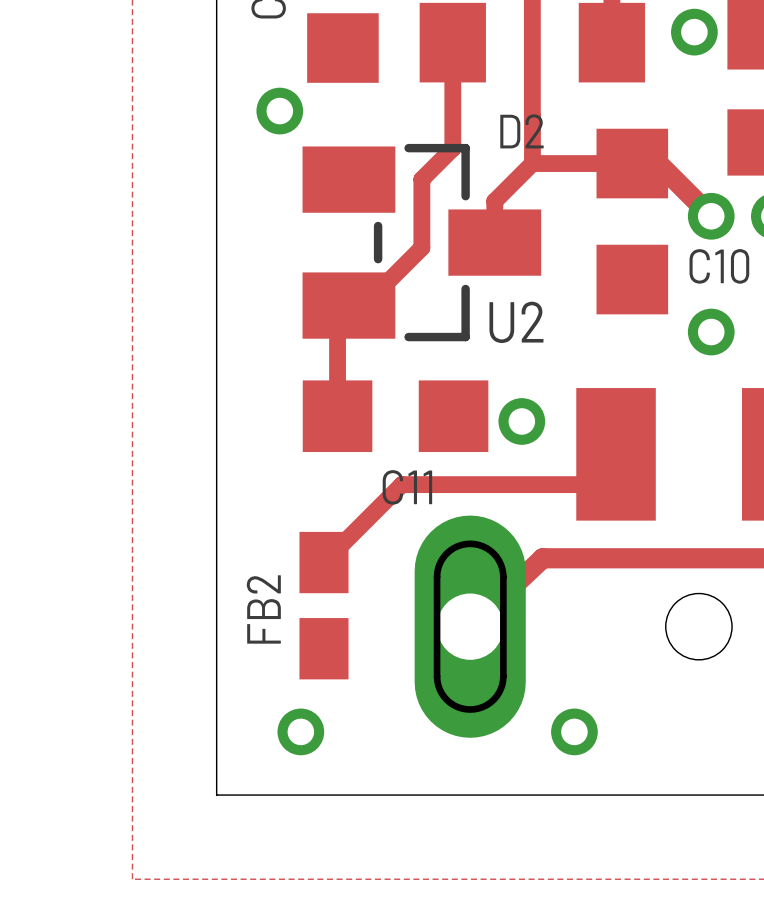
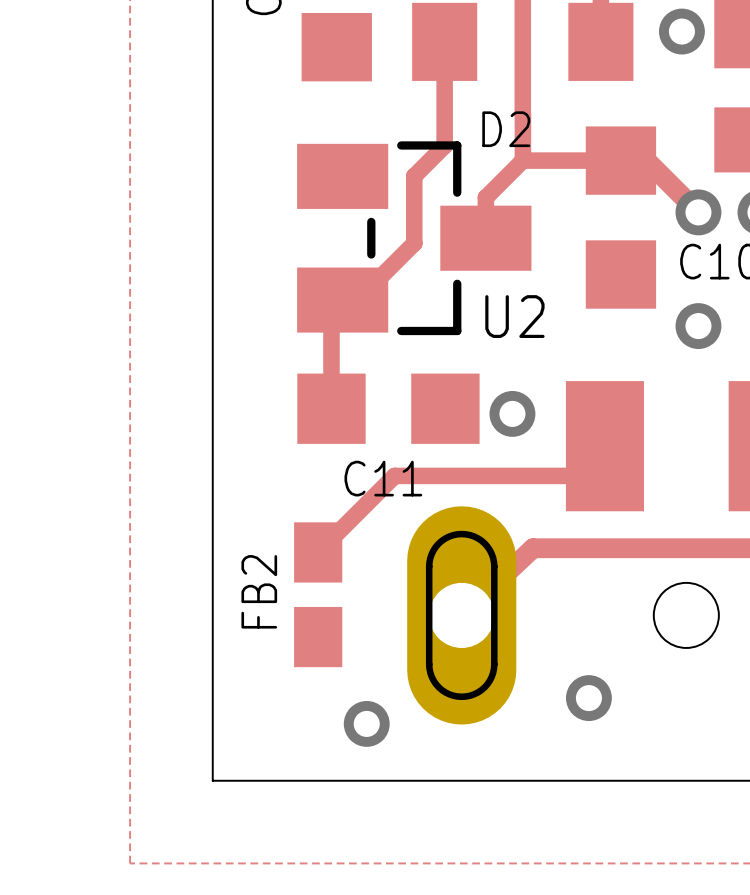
via: (279, 111) -> none
via position: (300, 731) -> (366, 723)
via position: (574, 731) -> (588, 698)

